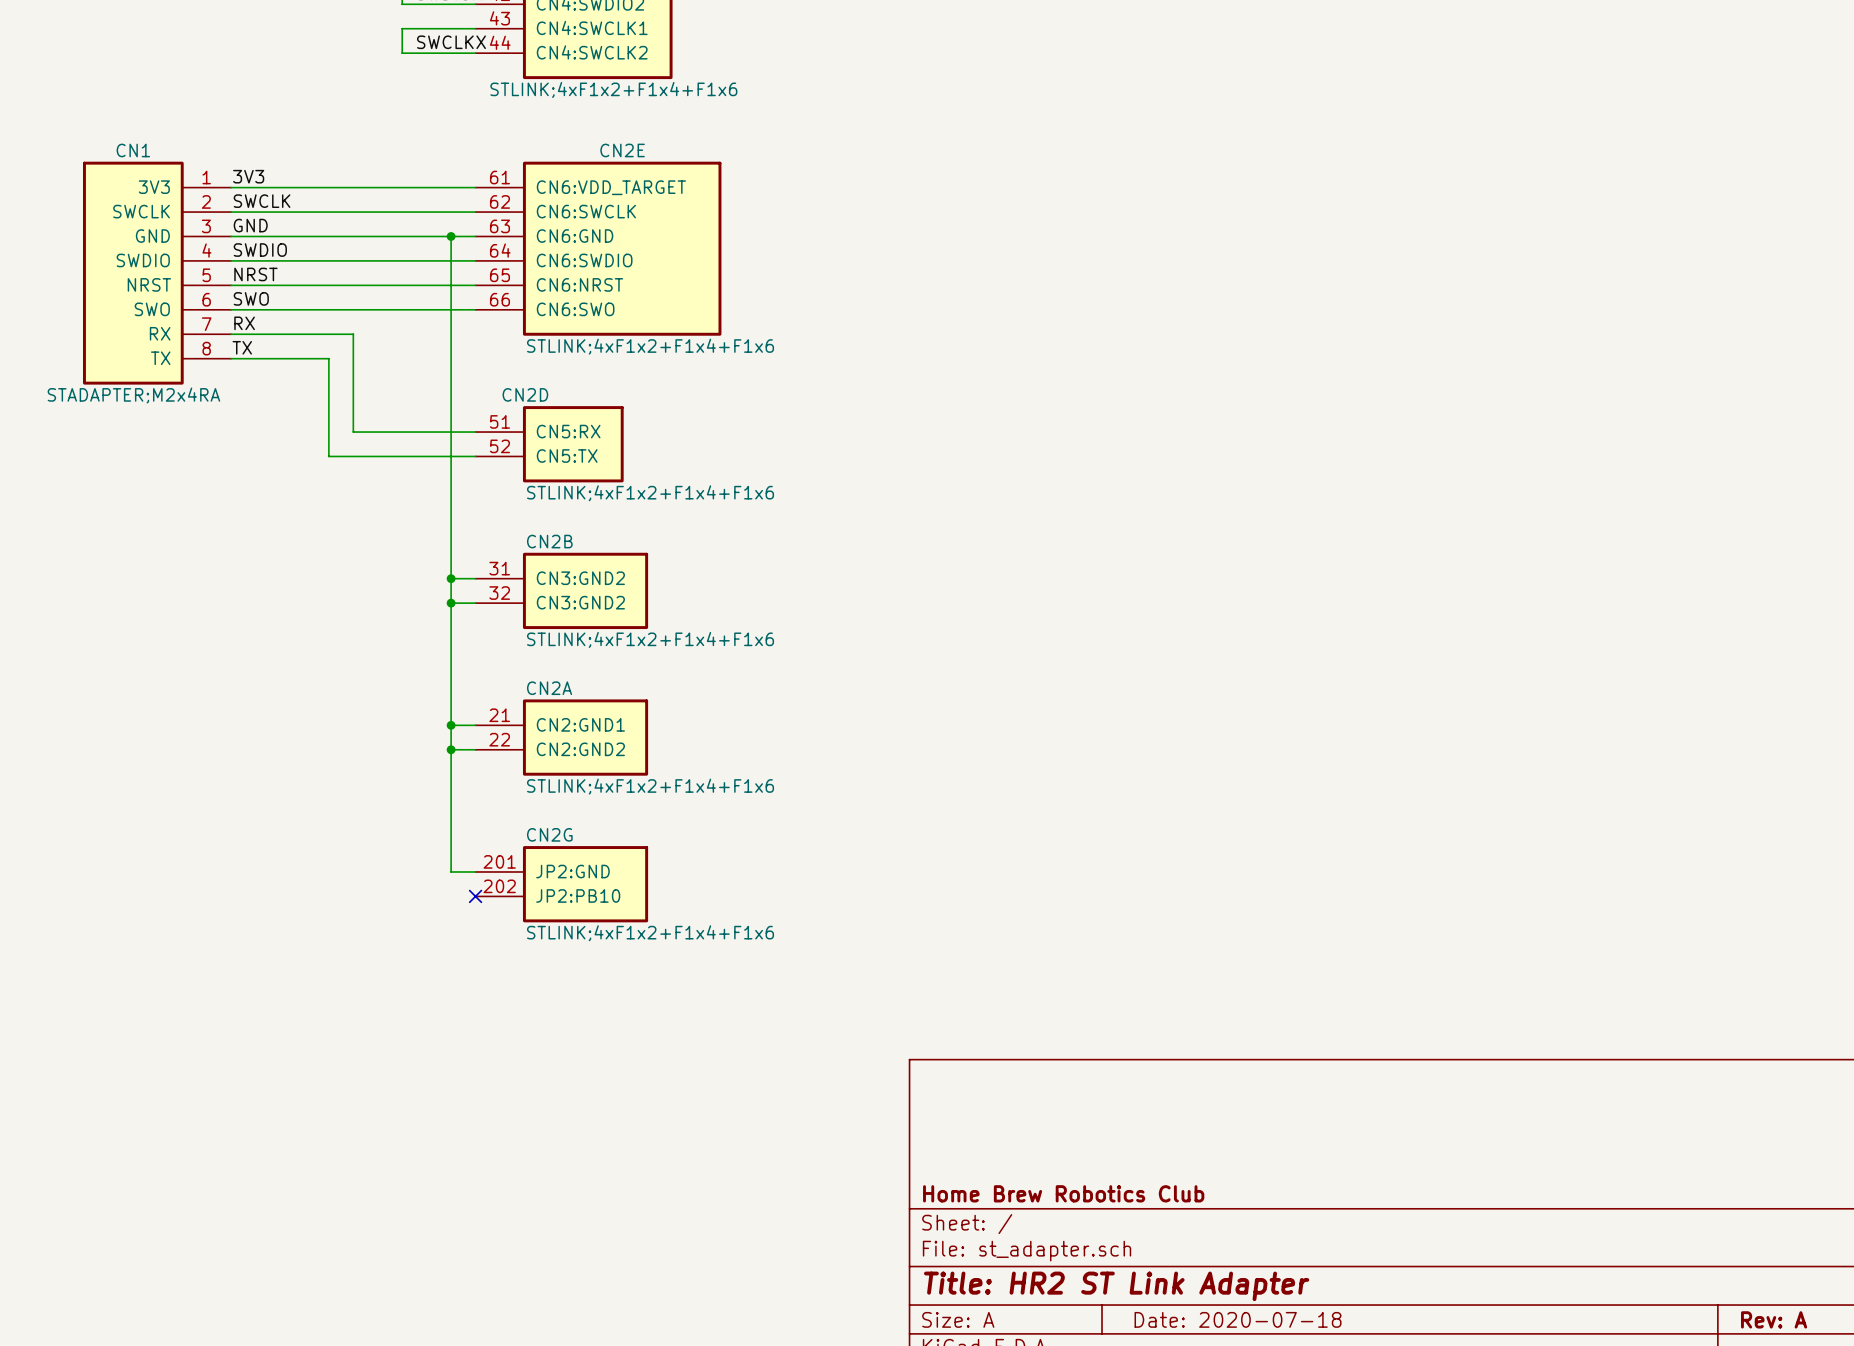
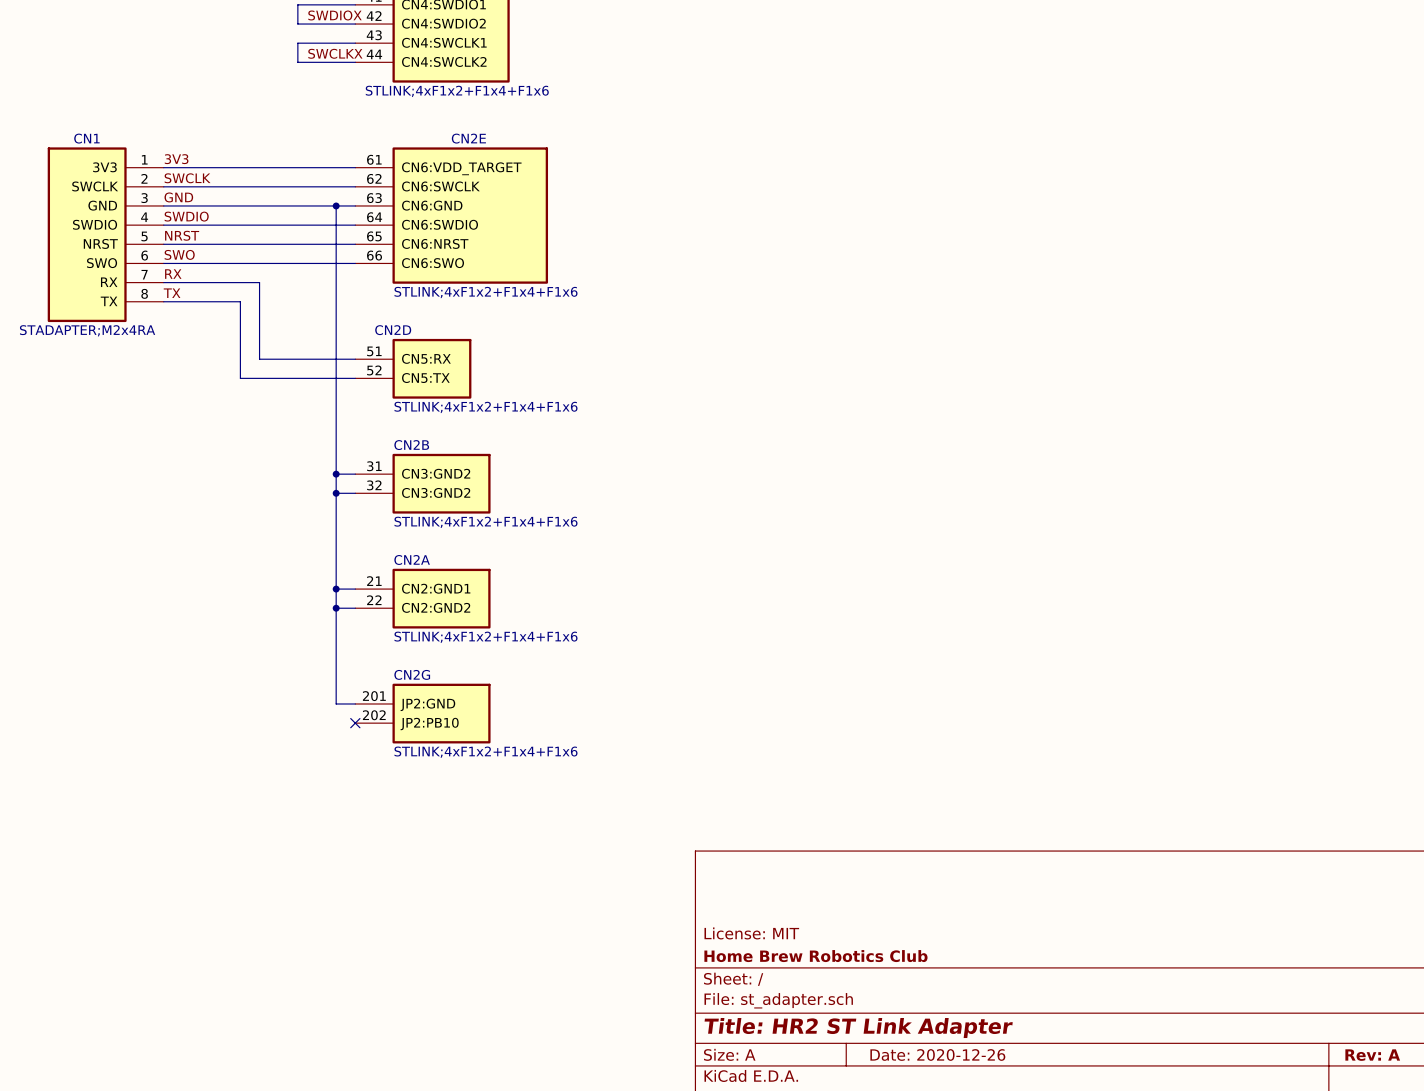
title block: none -> License: MIT (751, 933)
title block: Date: 2020-07-18 (1238, 1319) -> Date: 2020-12-26 (937, 1054)

